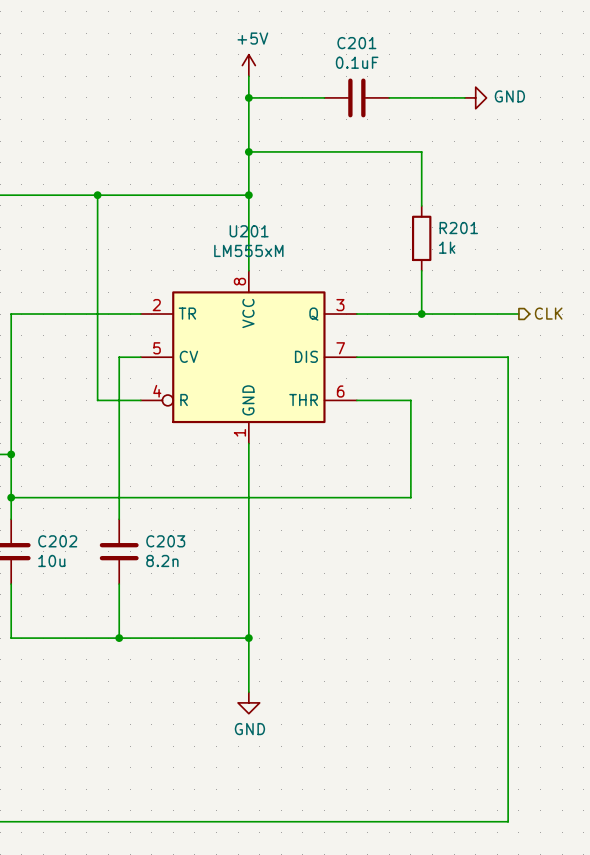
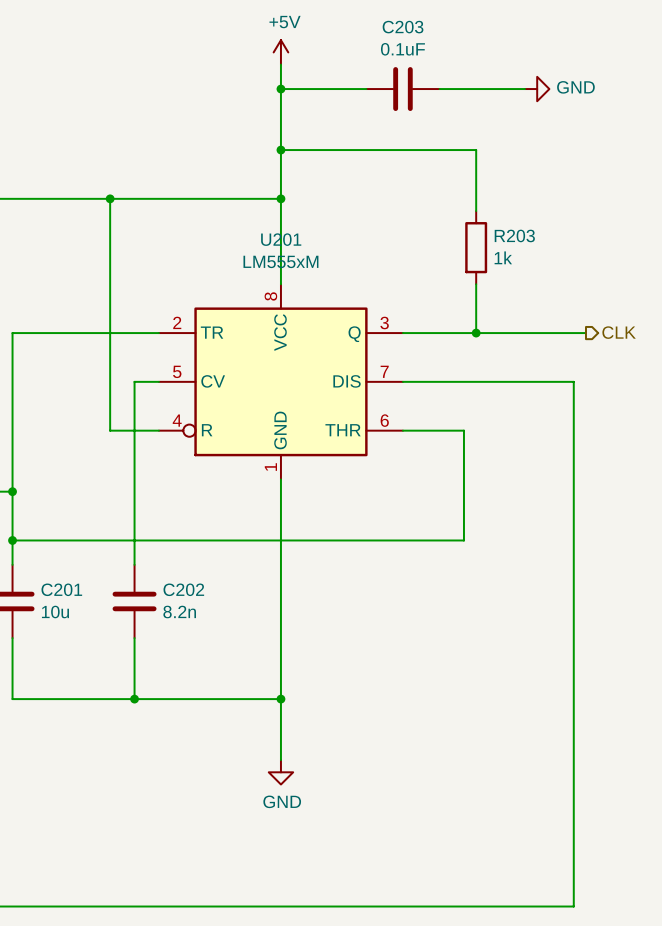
C201 name: C201 (356, 43) -> C203 (403, 27)
R201 name: R201 (458, 228) -> R203 (514, 235)
C202 name: C202 (57, 541) -> C201 (61, 589)
C203 name: C203 (165, 541) -> C202 (183, 589)

